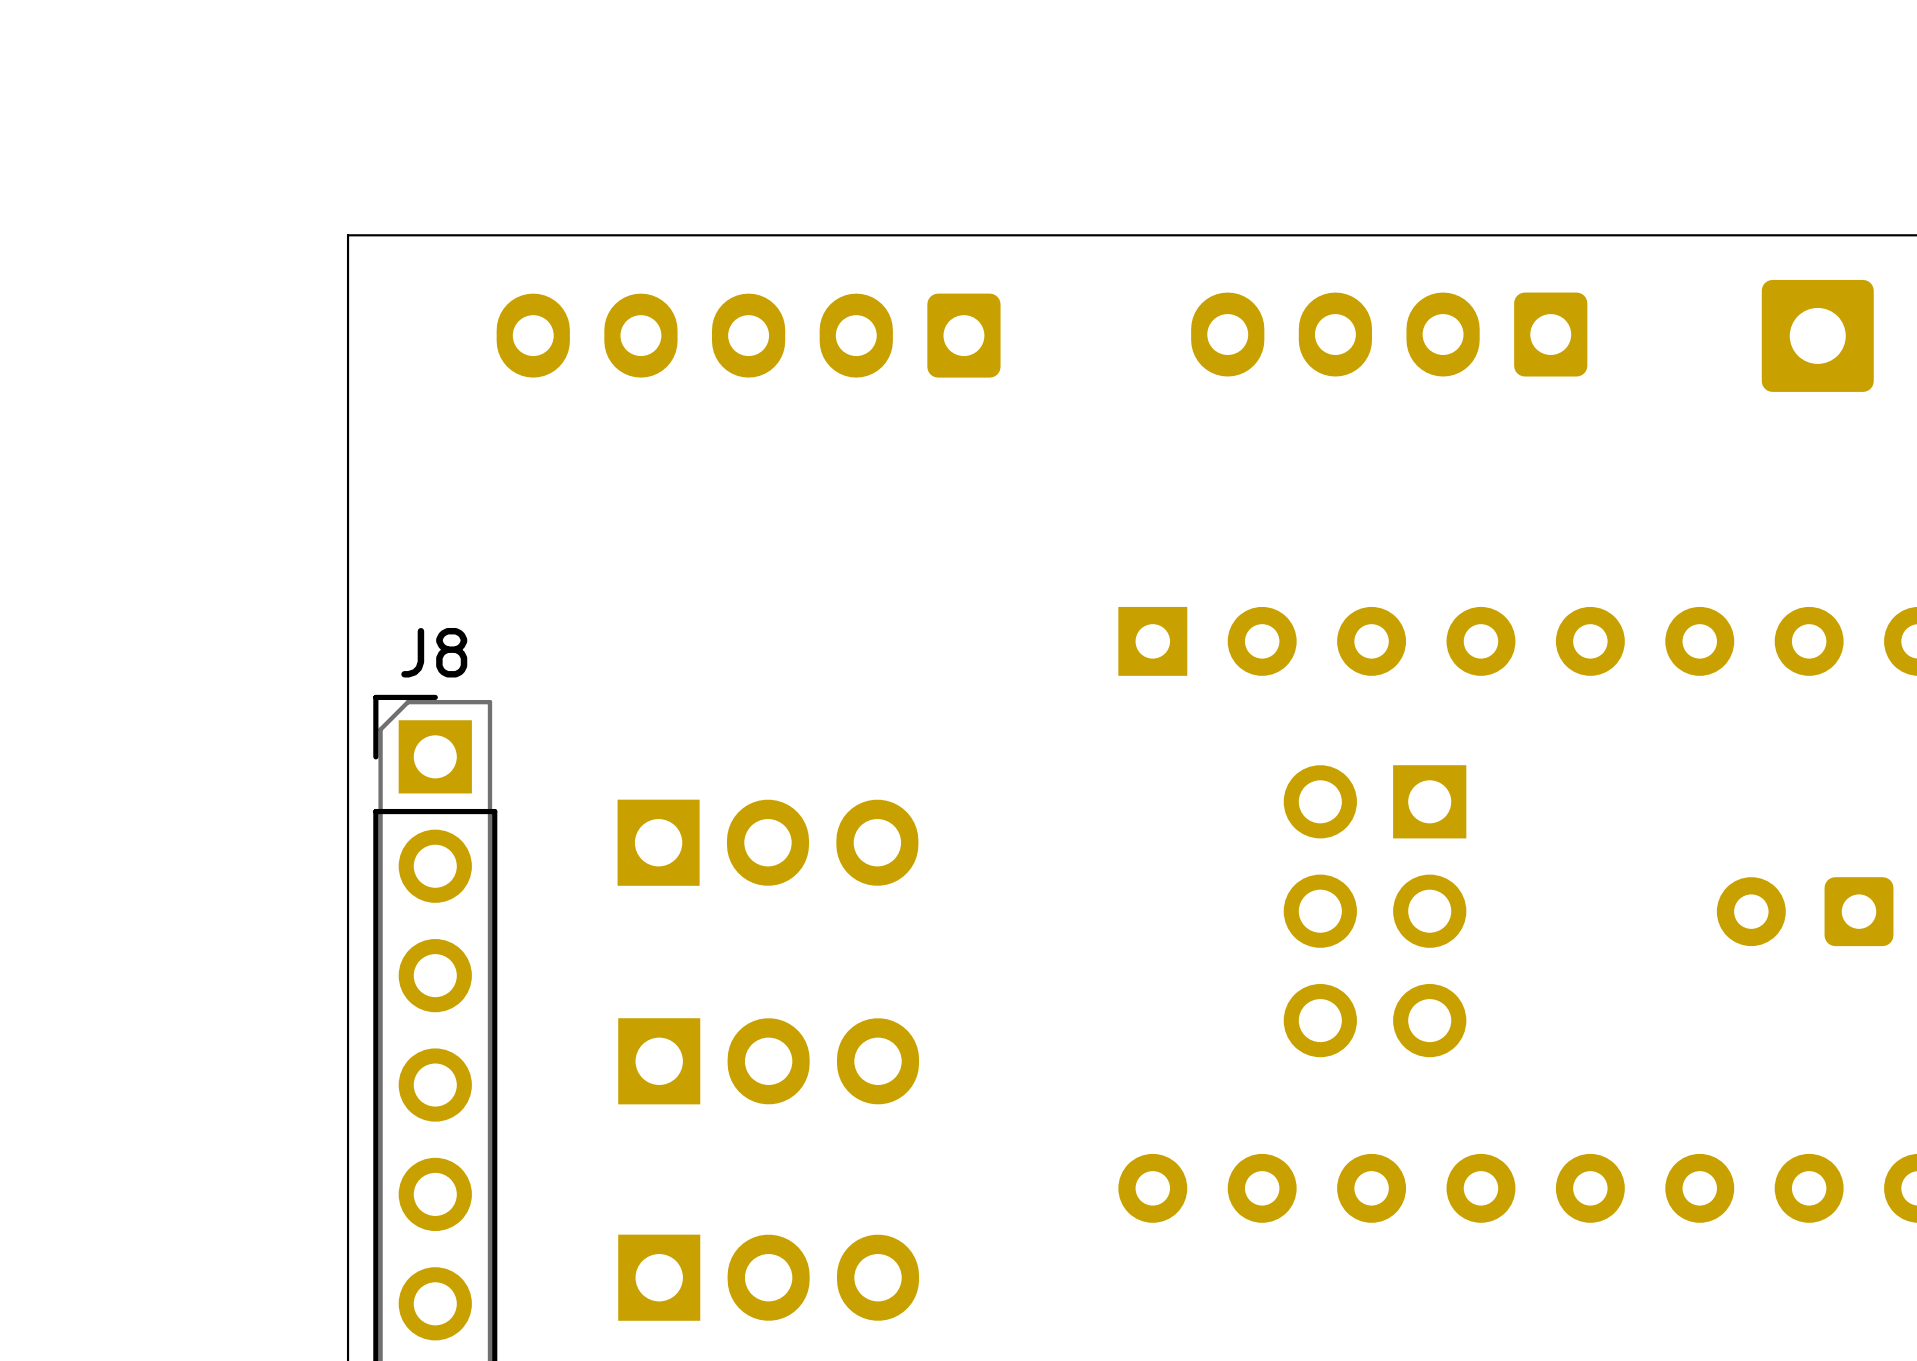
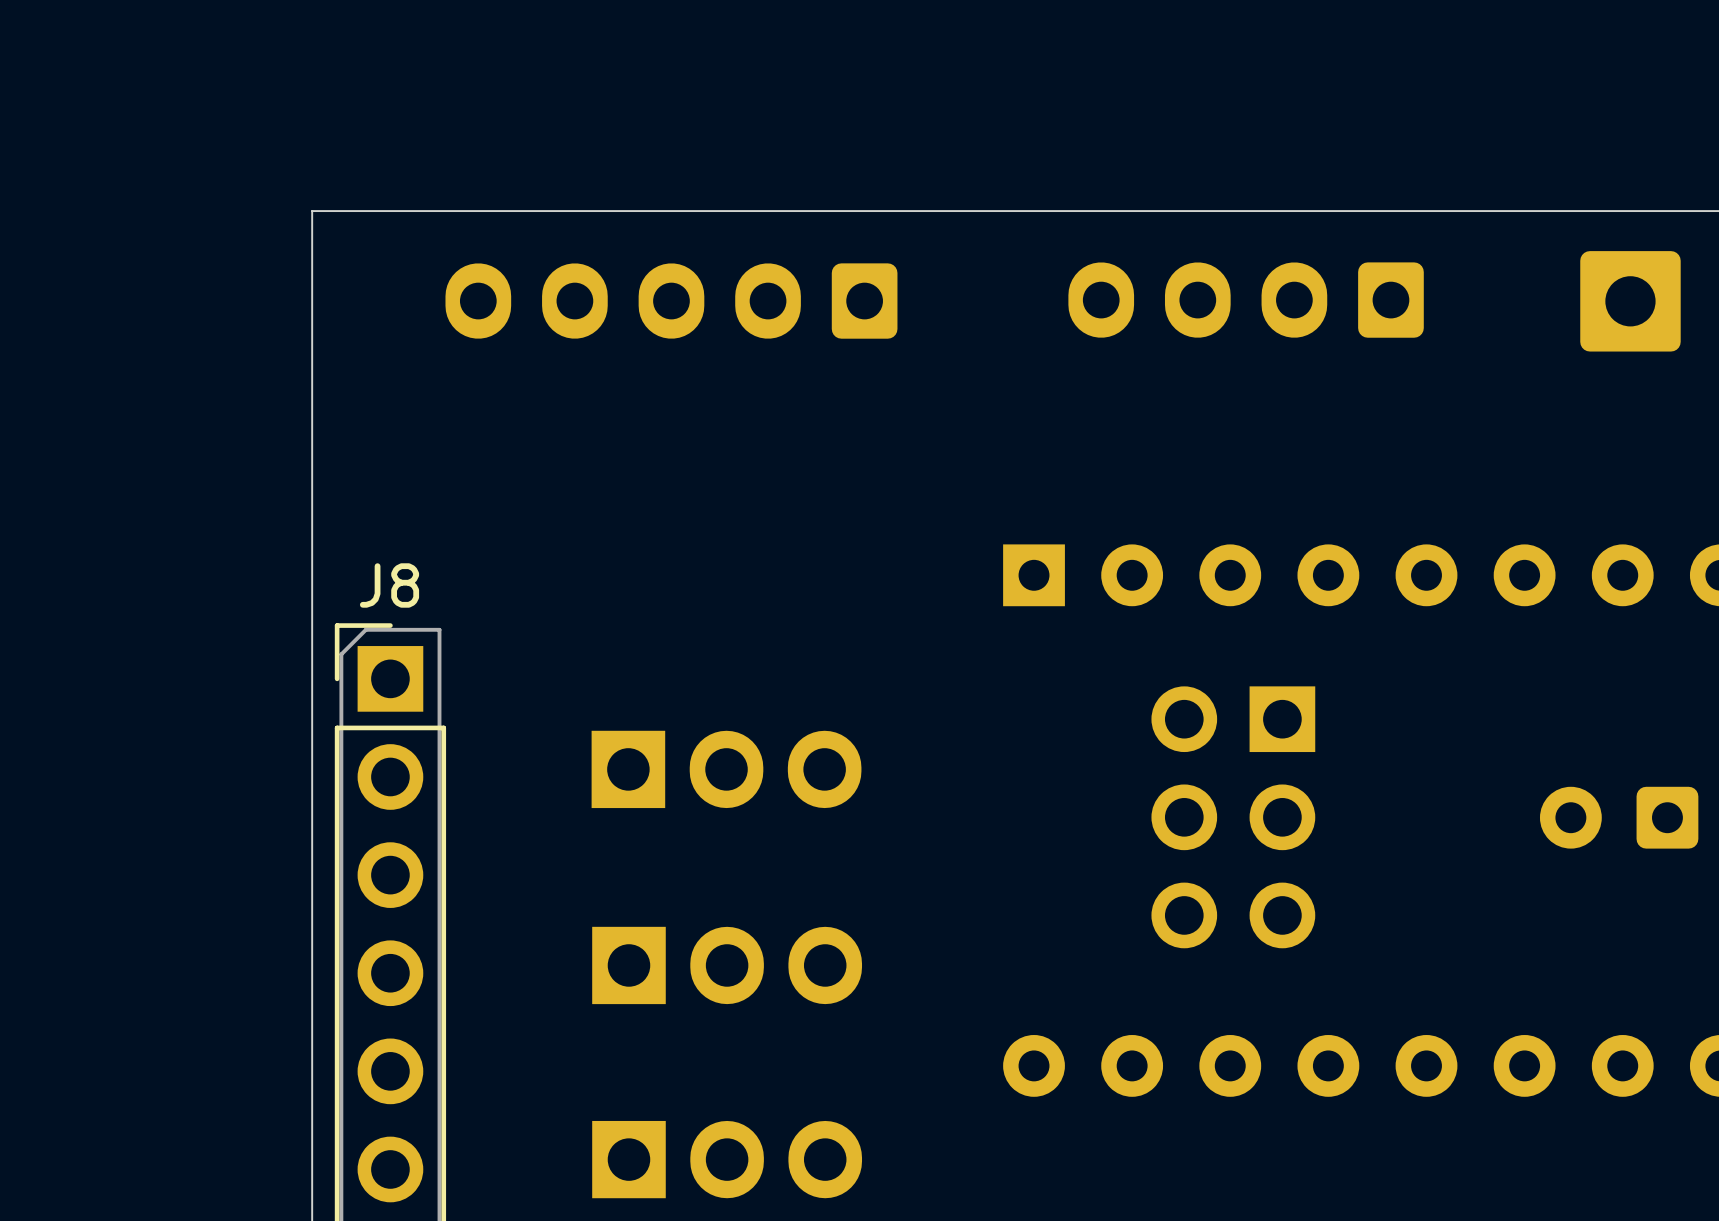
part position: (767, 842) -> (726, 769)
part position: (768, 1061) -> (727, 965)
part position: (768, 1277) -> (727, 1159)

